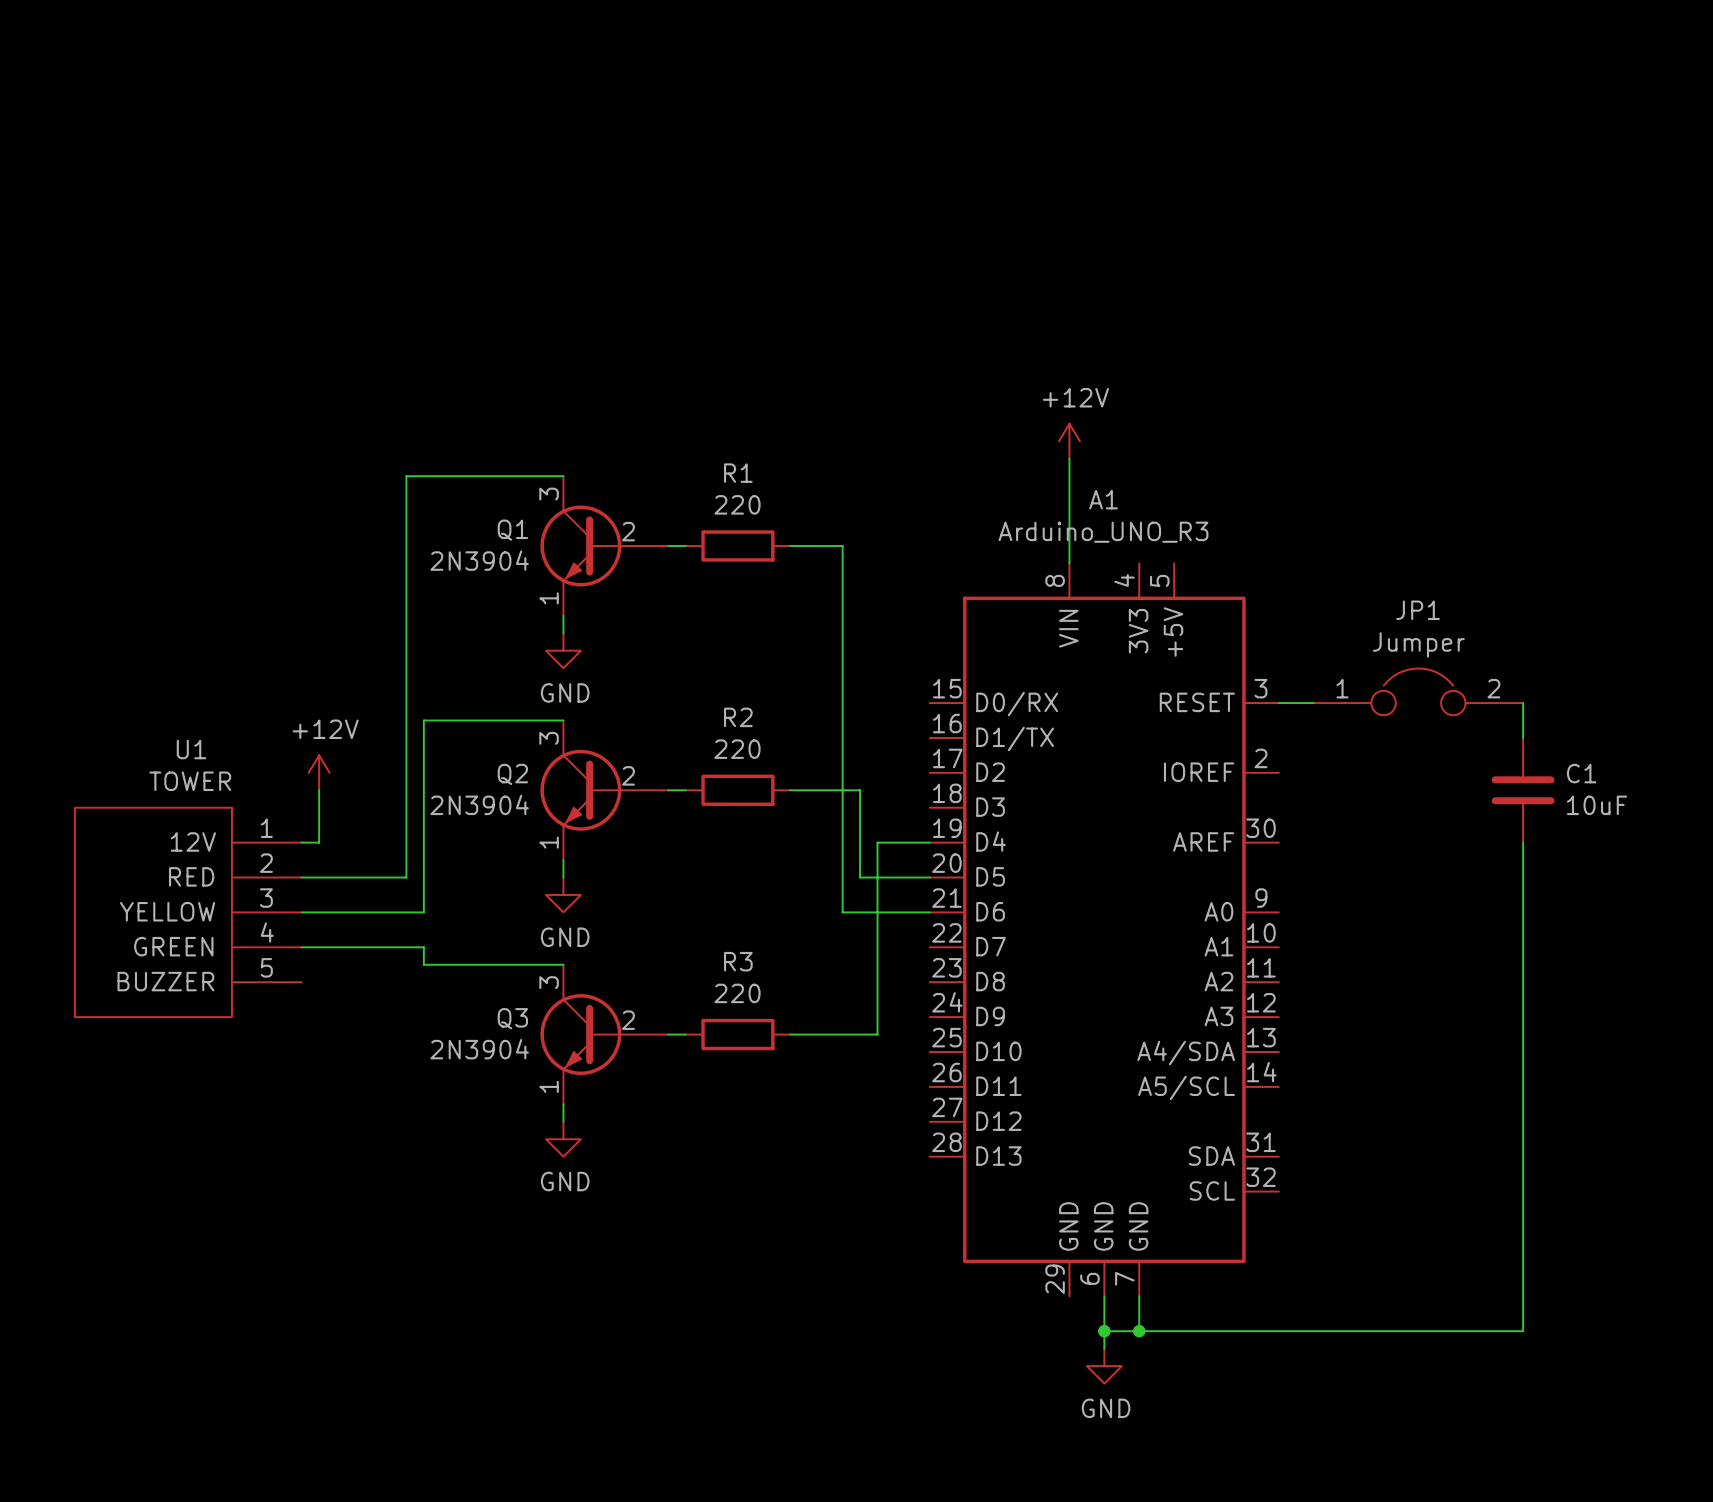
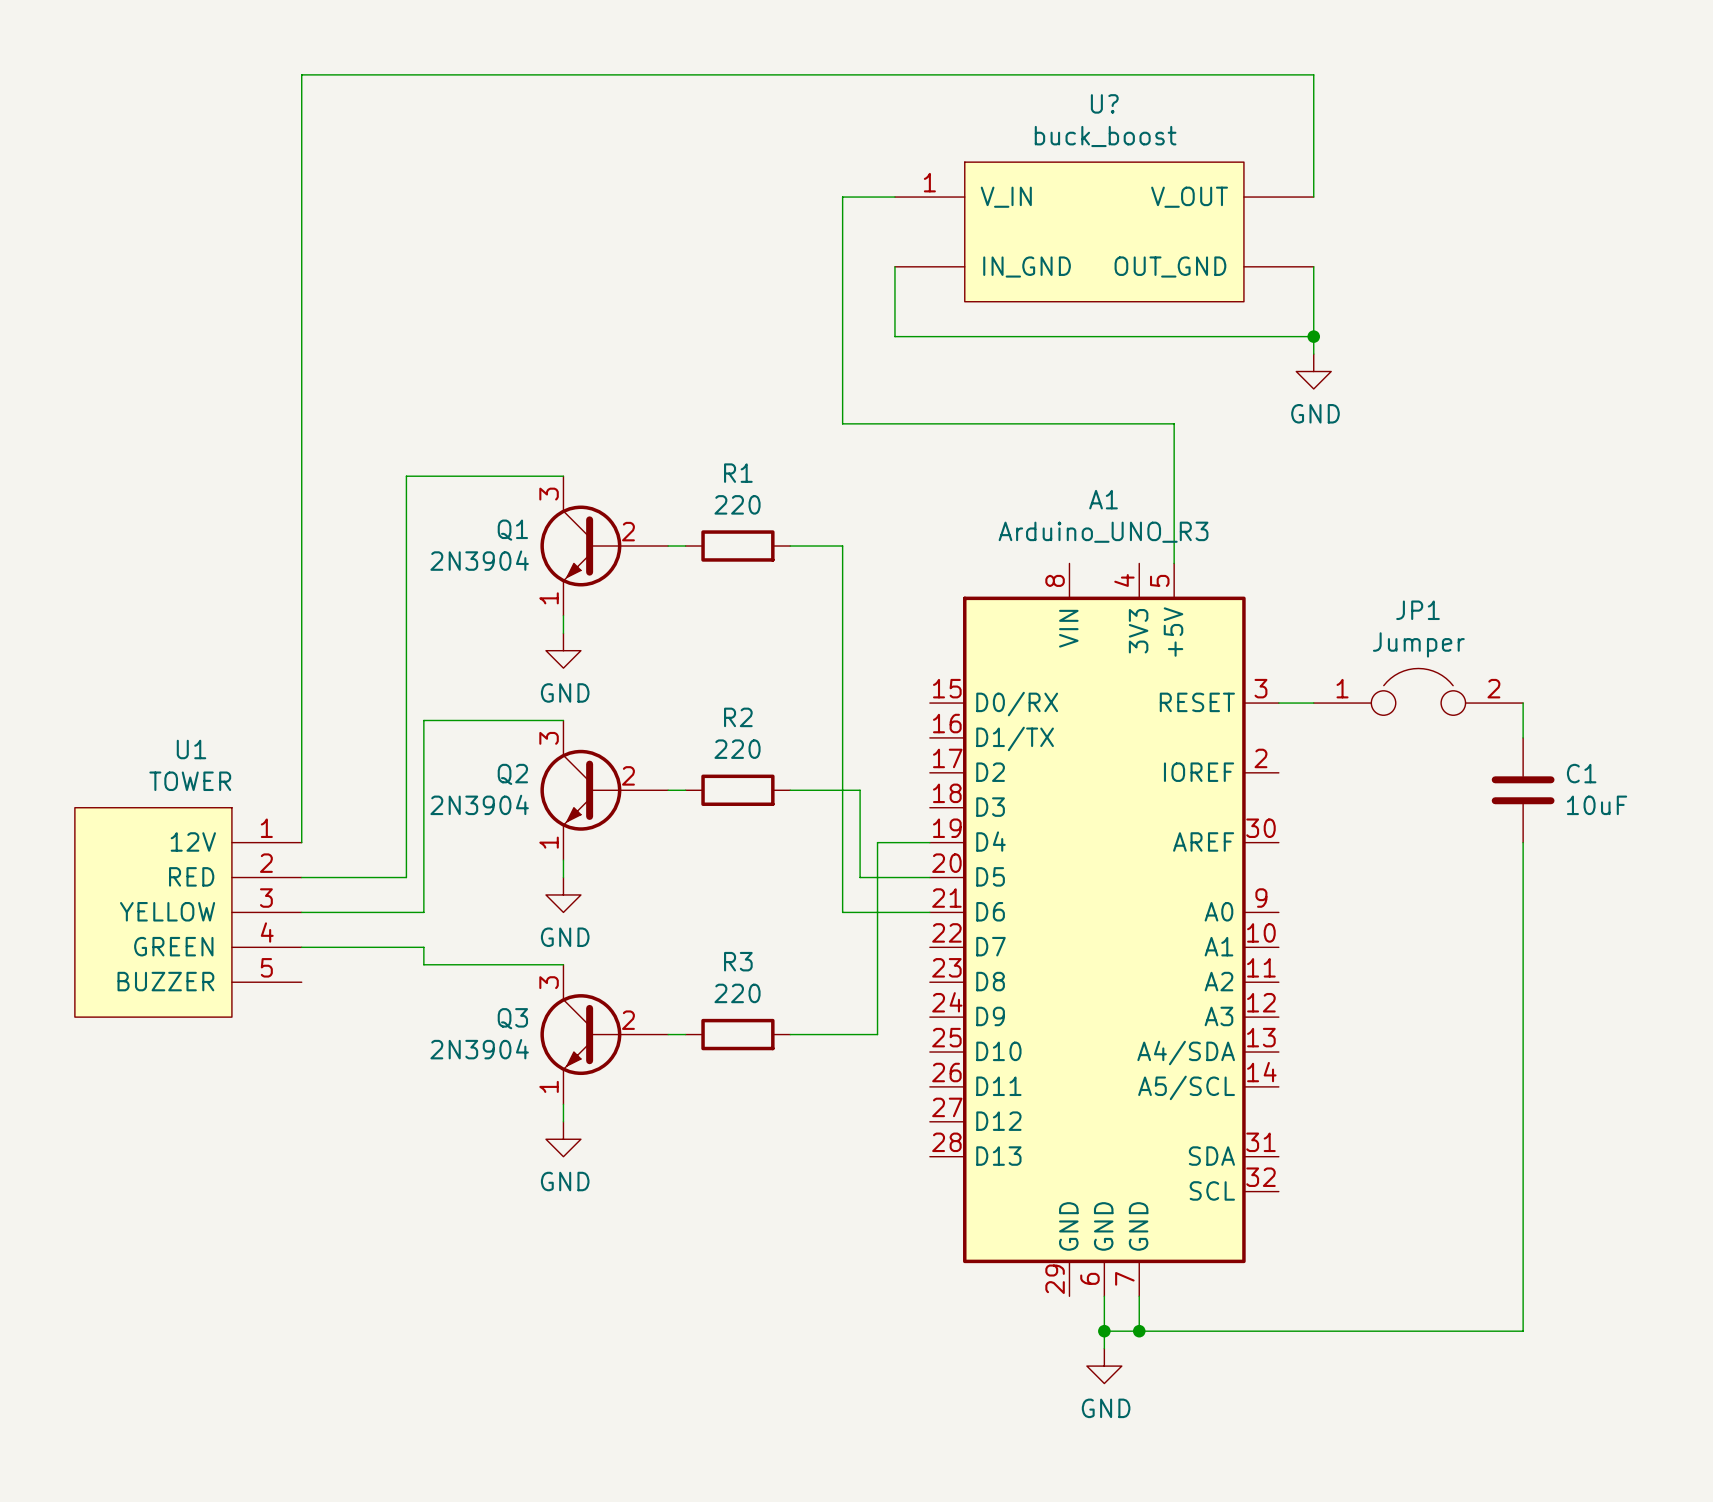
wire: none -> (894, 197) (842, 197) (842, 423) (1174, 423) (1174, 563)
U?: none -> buck_boost (1104, 231)
wire: none -> (894, 266) (894, 336) (1313, 336)
wire: none -> (1313, 266) (1313, 354)
junction: none -> (1313, 336)
power symbol: none -> GND (1313, 371)
power symbol: +12V (1069, 441) -> none
wire: (1069, 458) (1069, 563) -> none
power symbol: +12V (319, 772) -> none
wire: (319, 790) (319, 842) (301, 842) -> (1313, 197) (1313, 74) (301, 74) (301, 842)

